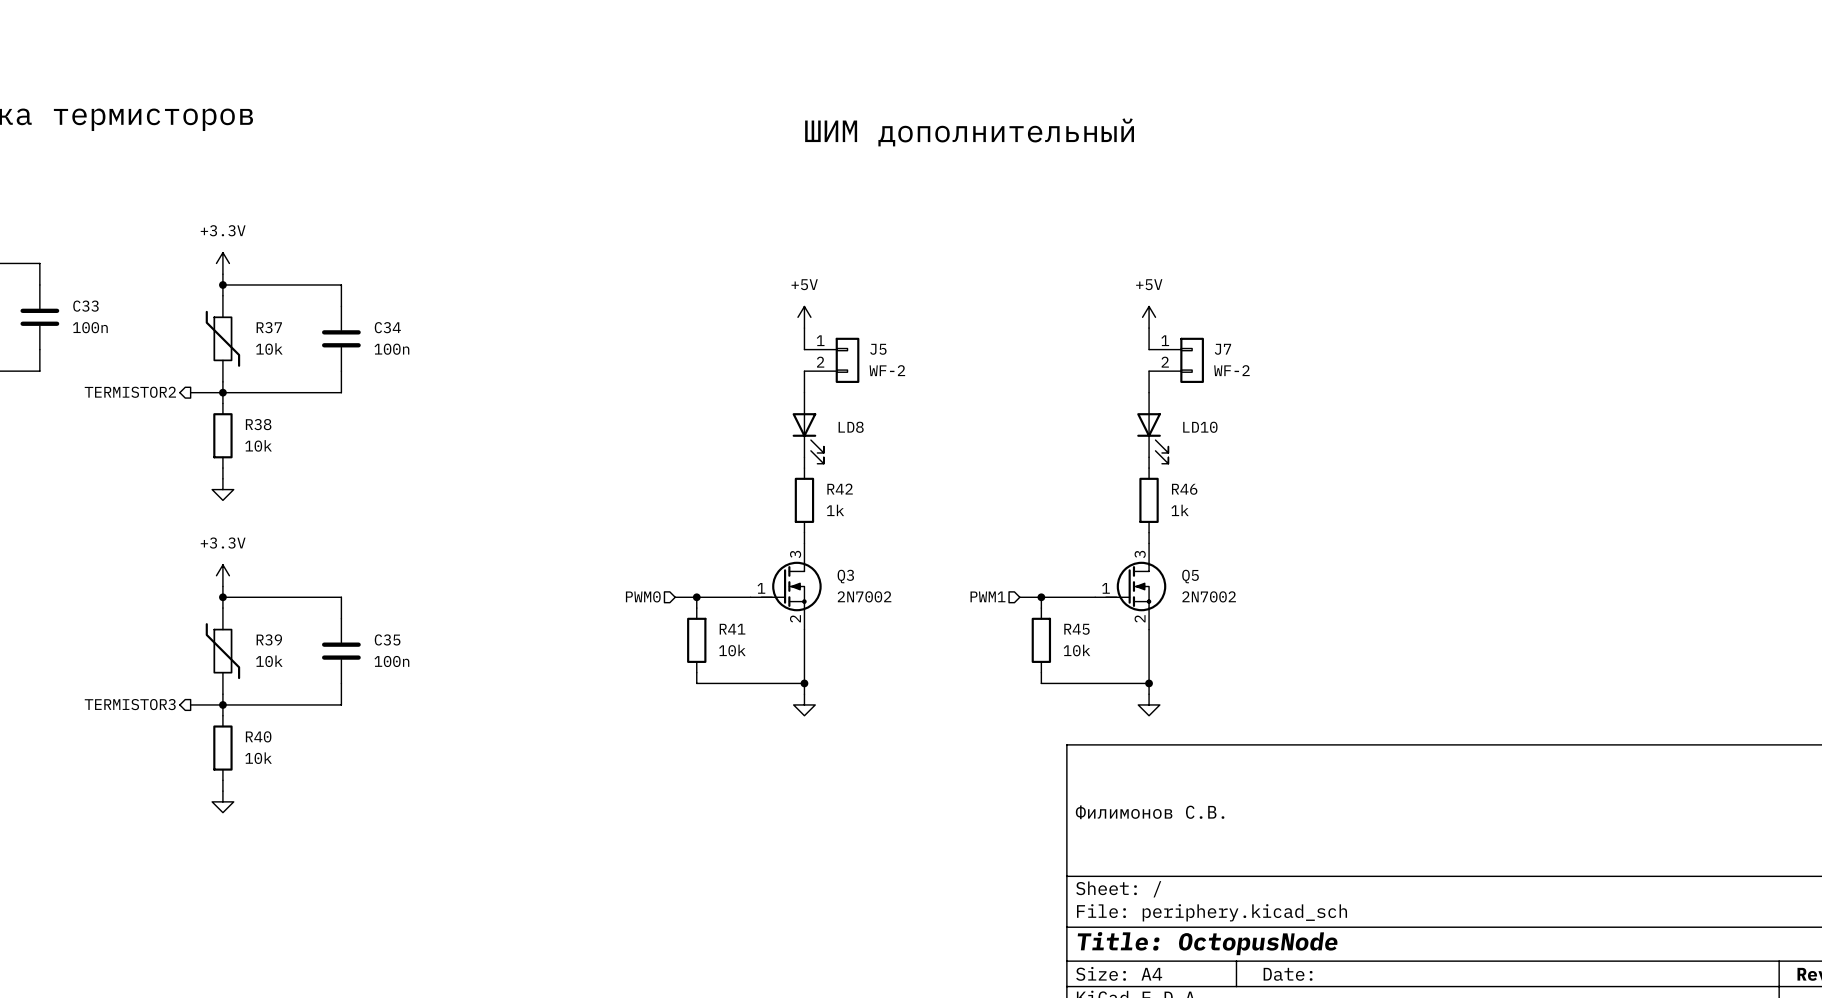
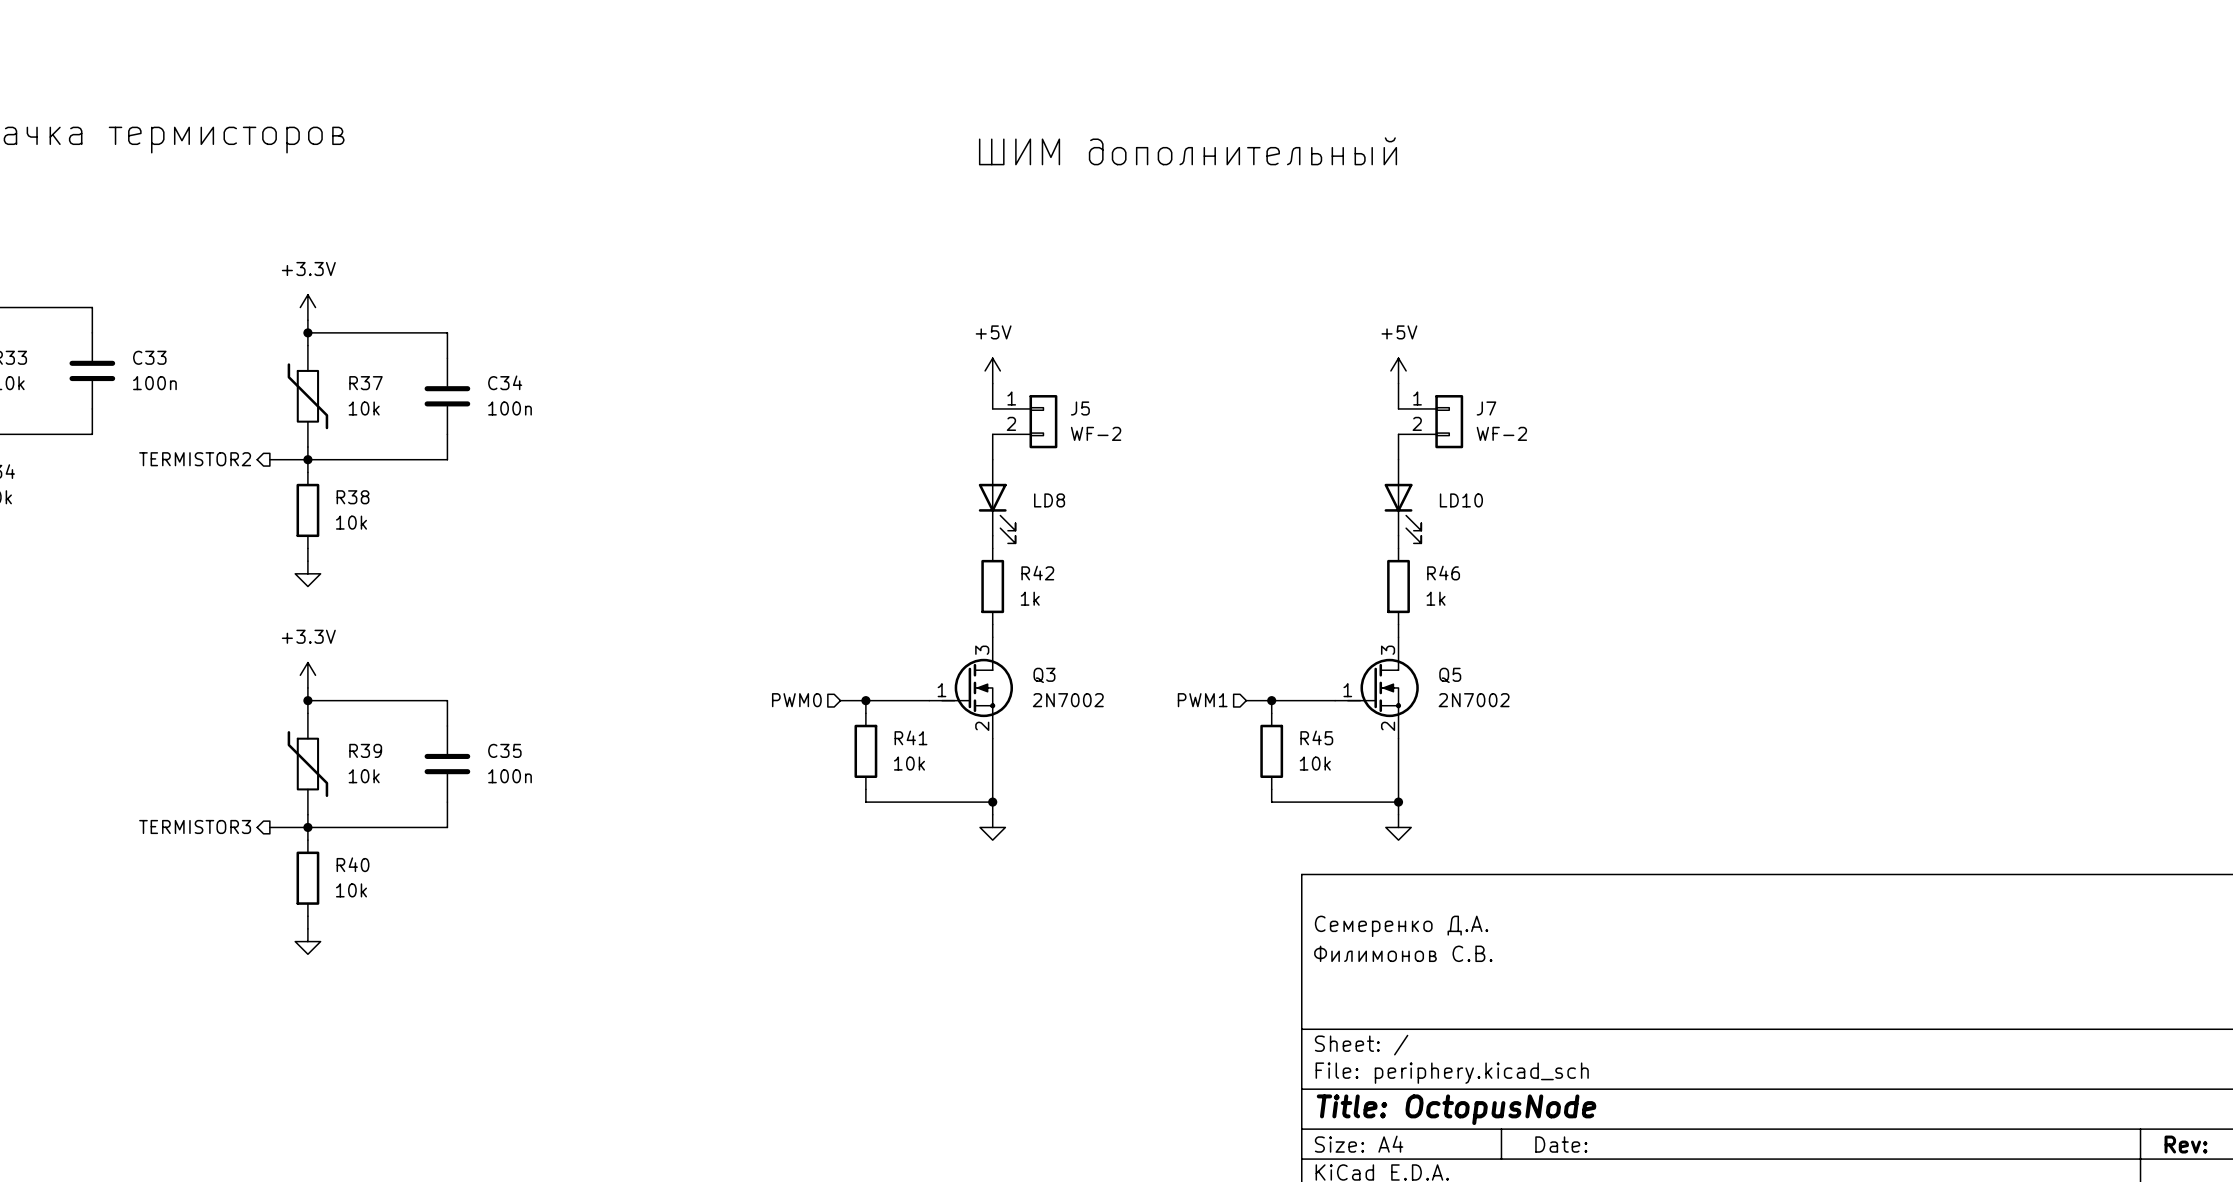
title block: none -> Семеренко Д.А. (1401, 926)

